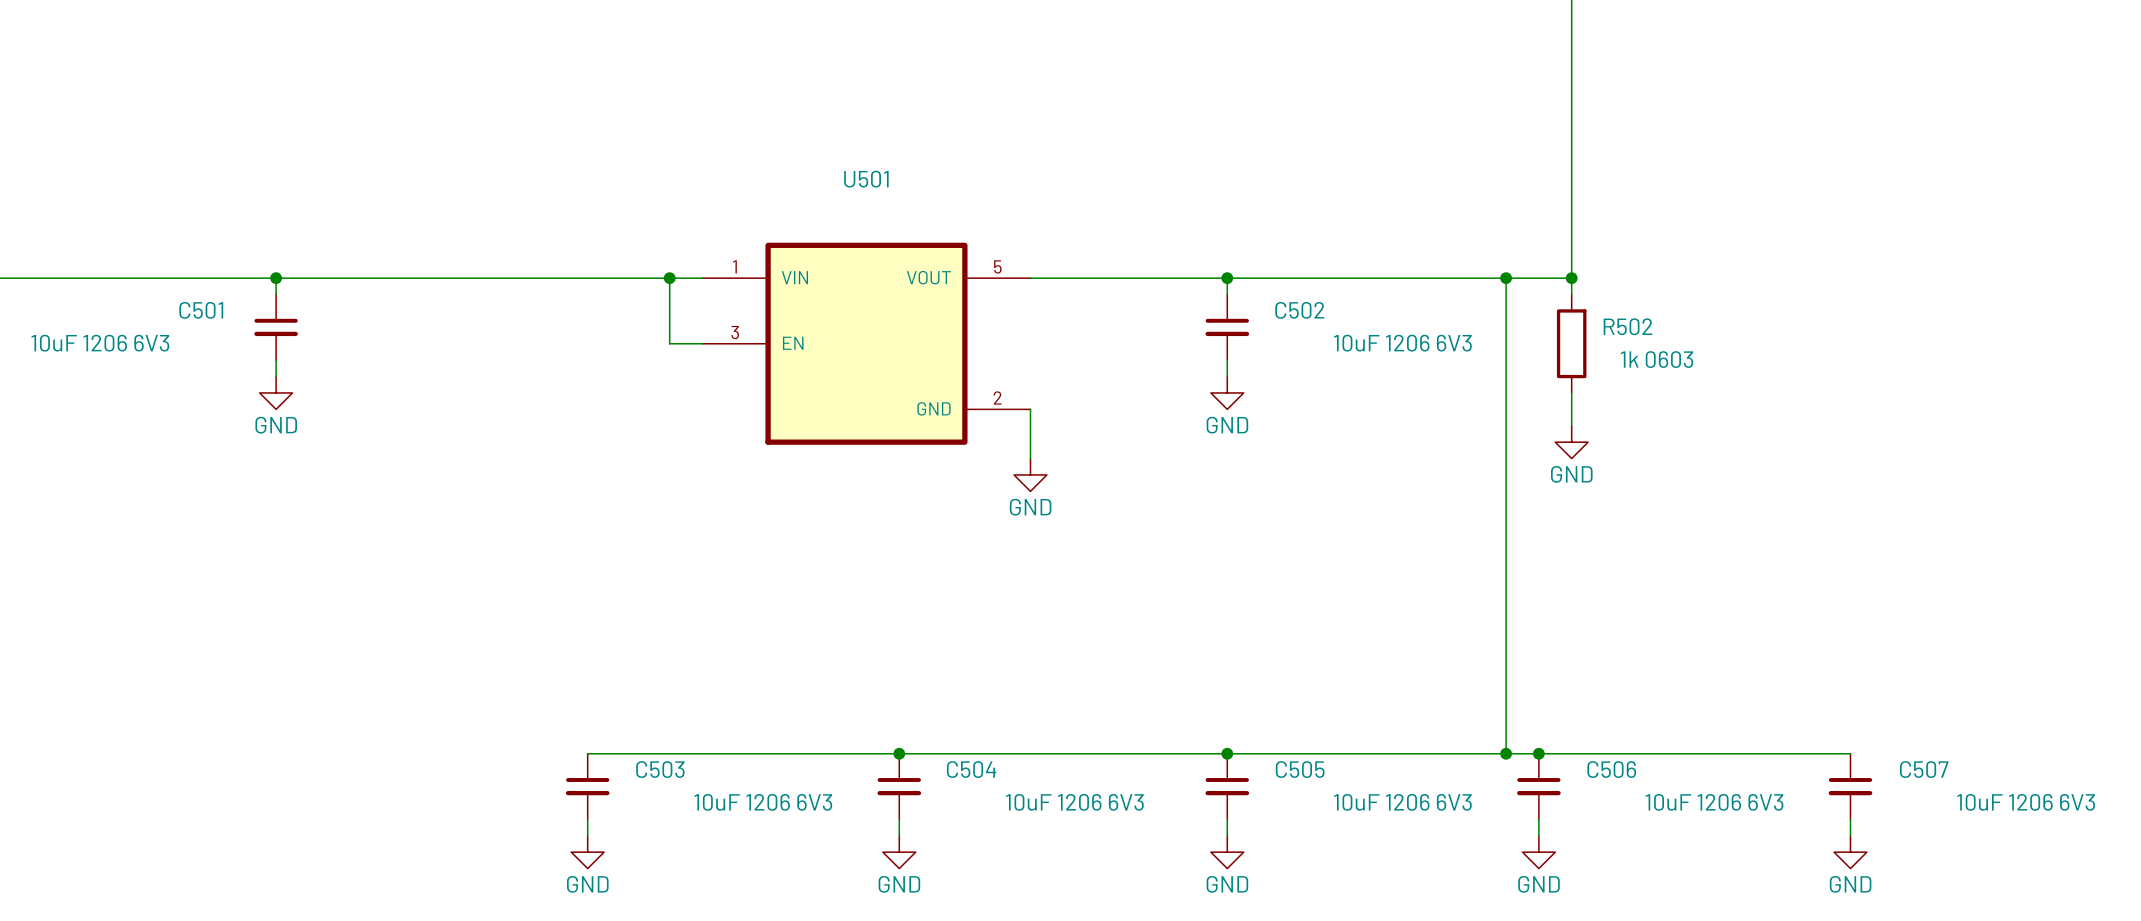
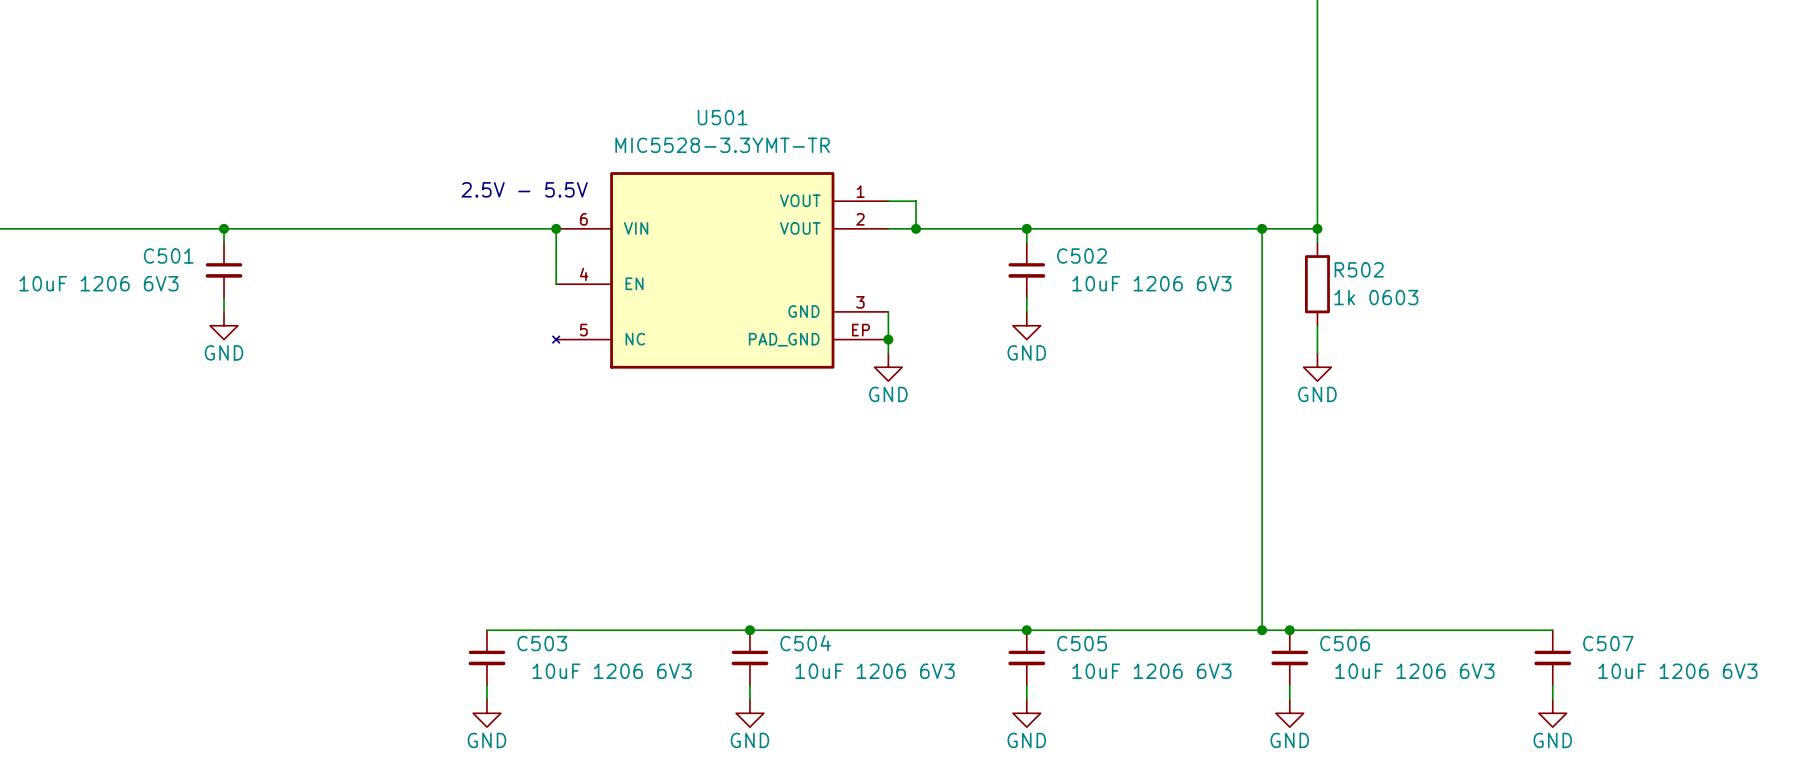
U501 value: none -> MIC5528-3.3YMT-TR (722, 145)
text: none -> 2.5V - 5.5V (524, 189)
U501 symbol: [702, 242, 1031, 445] -> [552, 172, 889, 369]
wire: none -> (888, 201) (916, 201) (916, 228)
junction: none -> (916, 228)
wire: (1030, 409) (1030, 458) -> (888, 311) (888, 353)
junction: none -> (888, 339)
power symbol position: GND (1030, 474) -> GND (888, 367)

